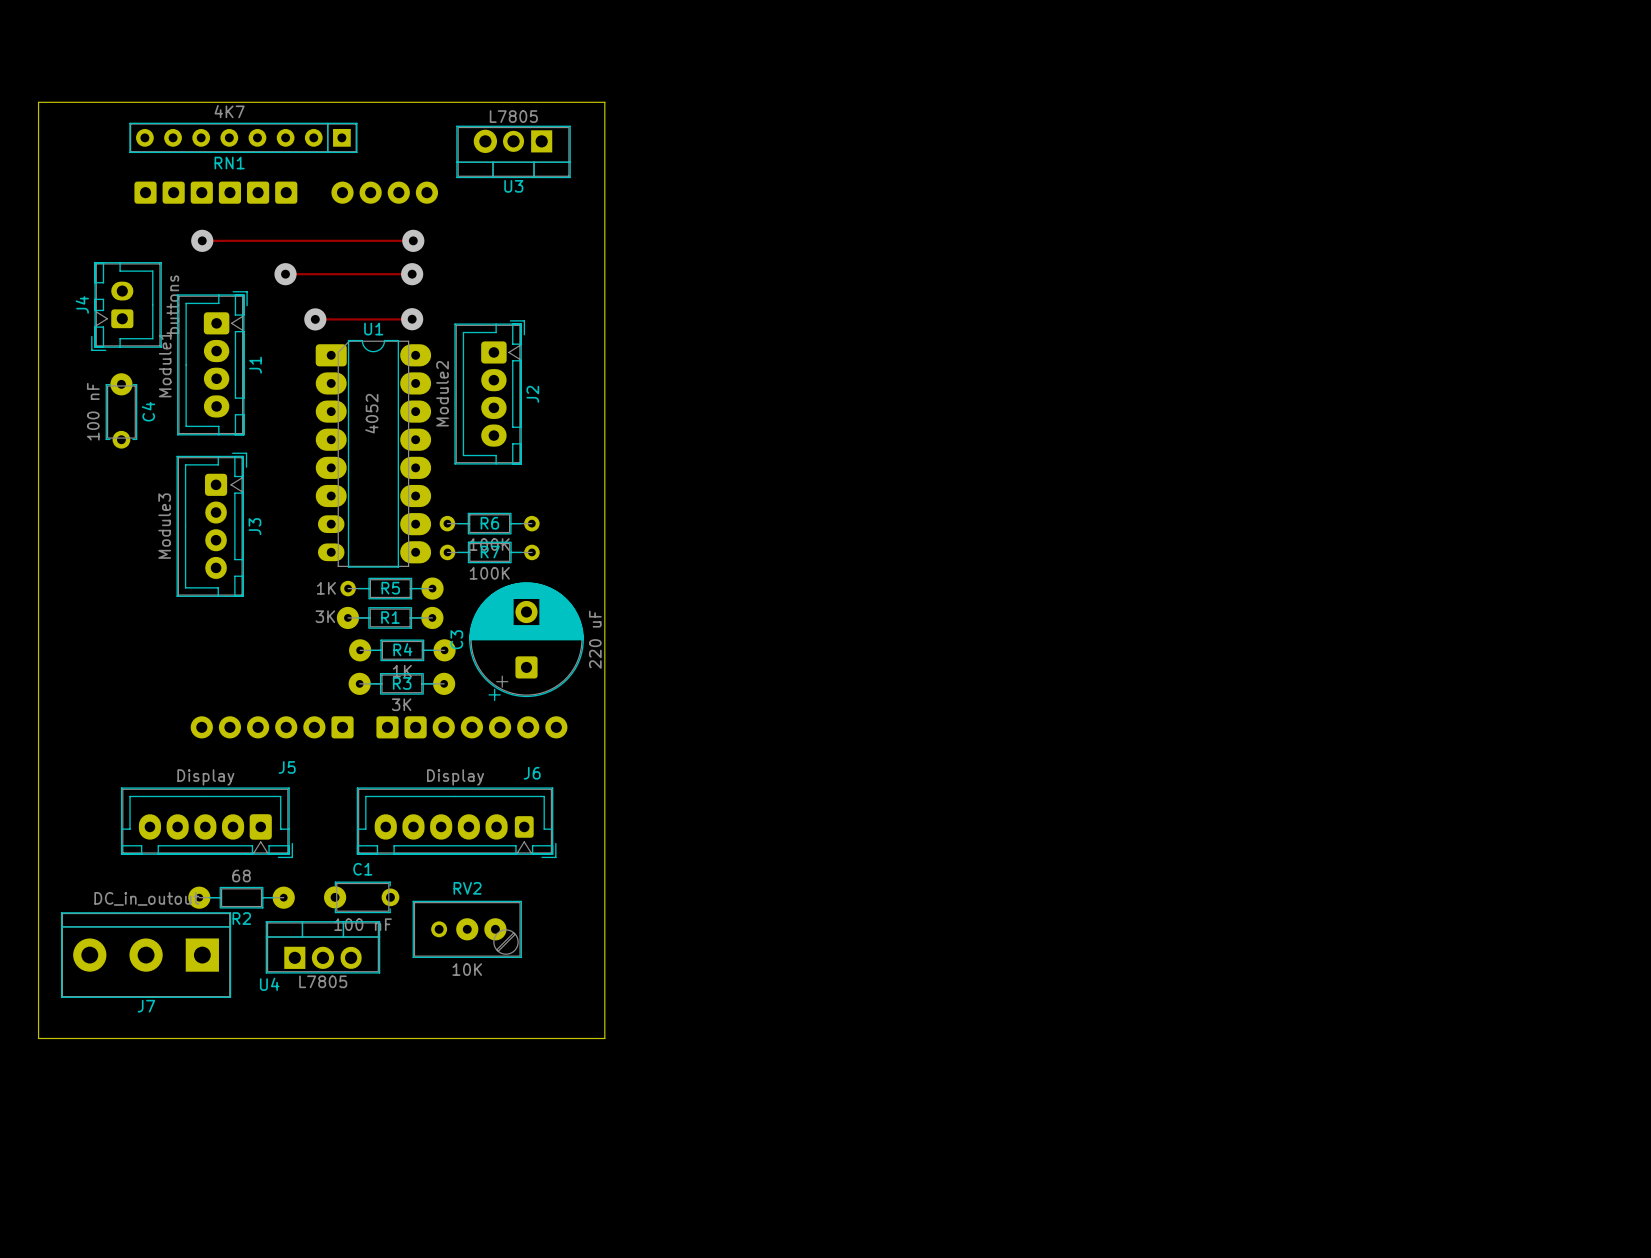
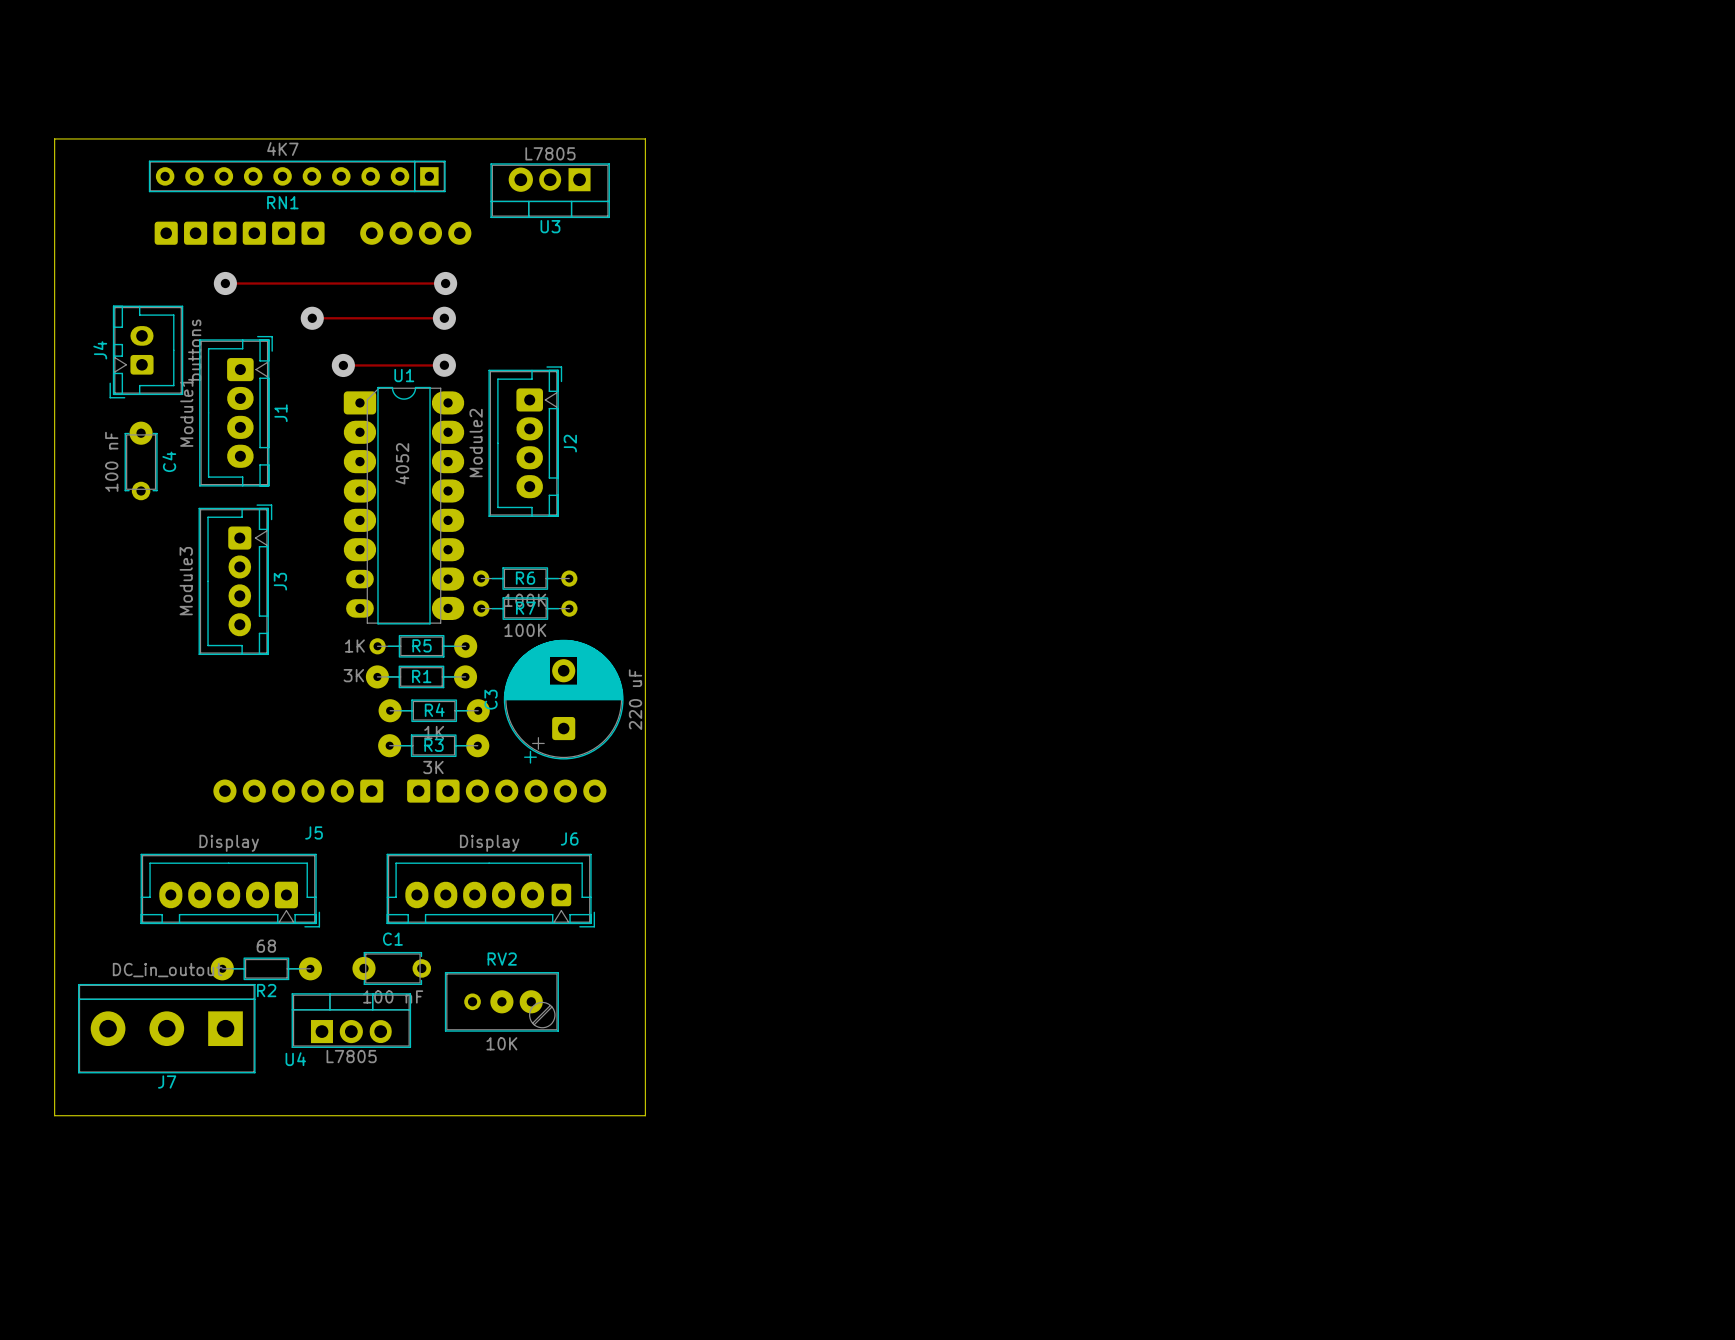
RN1 footprint: [129, 122, 358, 154] -> [148, 160, 446, 193]

